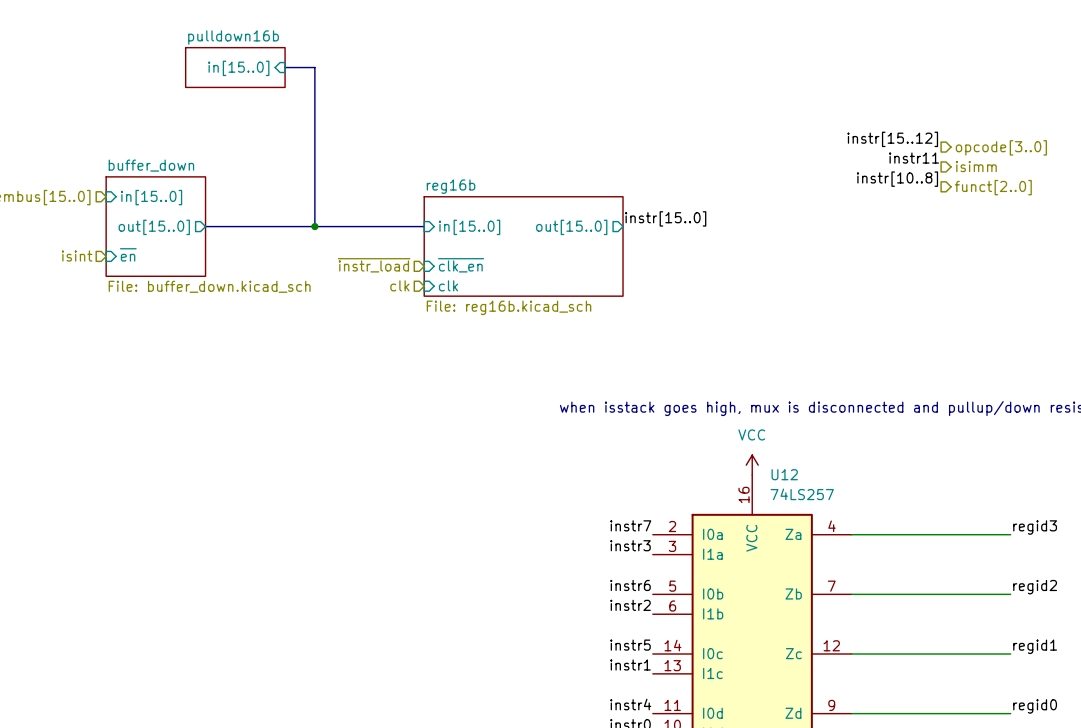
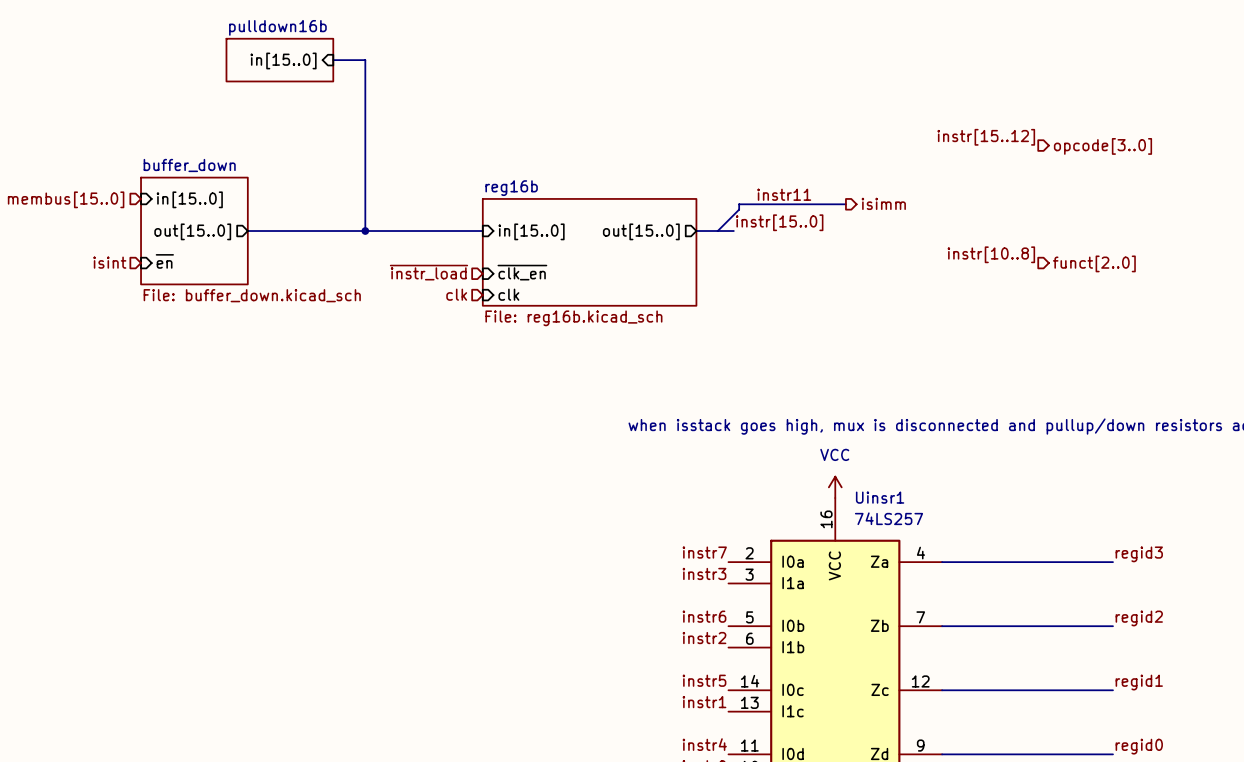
label: instr11 (914, 158) -> none
hierarchical label position: isimm (976, 166) -> isimm (883, 203)
label position: instr[10..8] (897, 179) -> instr[10..8] (991, 254)
hierarchical label position: funct[2..0] (993, 187) -> funct[2..0] (1094, 263)
label: none -> instr11 (784, 194)
wire: none -> (845, 204) (739, 204) (739, 209) (717, 231)
label position: instr[15..0] (665, 218) -> instr[15..0] (779, 222)
bus: none -> (696, 231) (733, 231)
U12 name: U12 (784, 474) -> Uinsr1 (880, 497)

